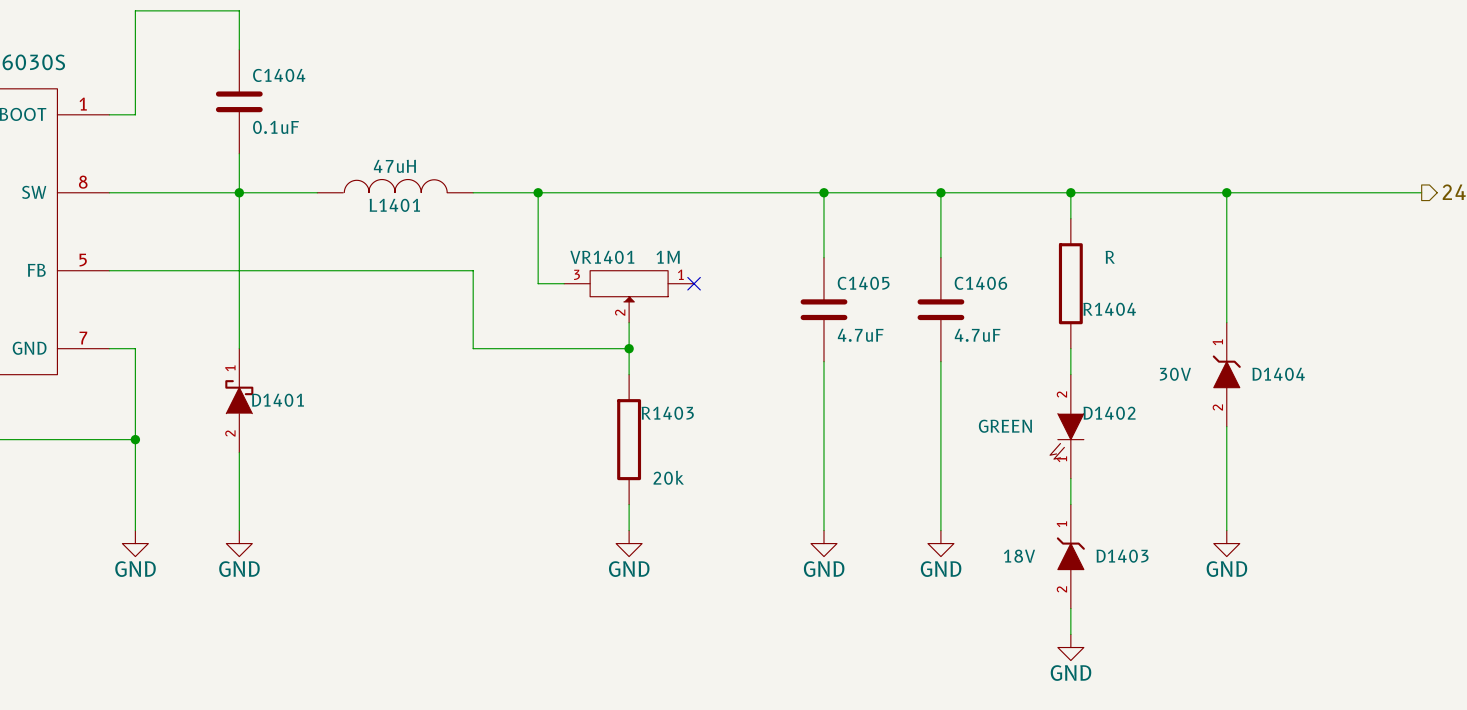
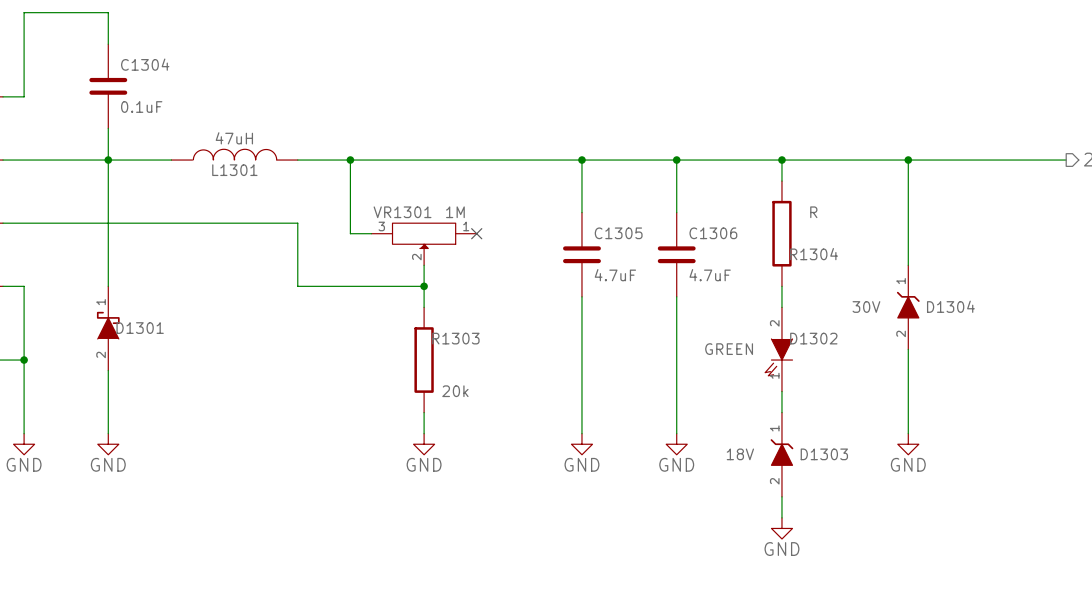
C1404 name: C1404 (279, 75) -> C1304 (145, 64)
L1401 name: L1401 (394, 205) -> L1301 (234, 170)
VR1401 name: VR1401 (602, 257) -> VR1301 (402, 212)
C1405 name: C1405 (863, 283) -> C1305 (618, 233)
C1406 name: C1406 (980, 283) -> C1306 (713, 233)
R1404 name: R1404 (1109, 309) -> R1304 (814, 254)
D1404 name: D1404 (1278, 374) -> D1304 (950, 306)
D1401 name: D1401 (277, 400) -> D1301 (140, 328)
R1403 name: R1403 (667, 413) -> R1303 (455, 338)
D1402 name: D1402 (1109, 413) -> D1302 (813, 338)
D1403 name: D1403 (1122, 556) -> D1303 (824, 454)

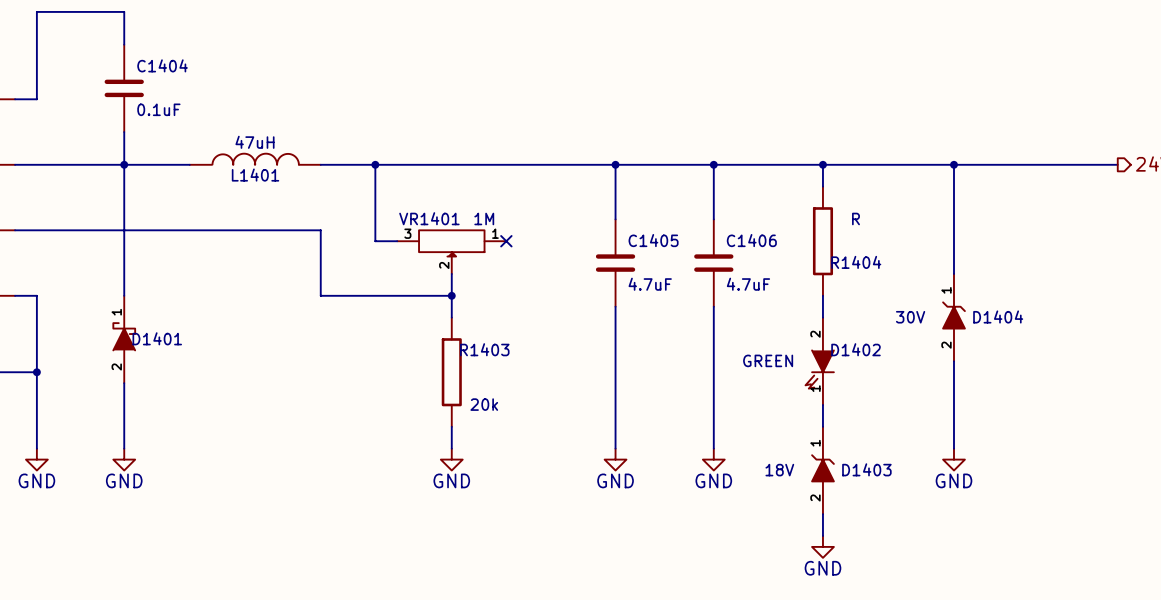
C1304 name: C1304 (145, 64) -> C1404 (162, 65)
L1301 name: L1301 (234, 170) -> L1401 (255, 175)
VR1301 name: VR1301 (402, 212) -> VR1401 (429, 218)
C1305 name: C1305 (618, 233) -> C1405 (653, 240)
C1306 name: C1306 (713, 233) -> C1406 (751, 240)
R1304 name: R1304 (814, 254) -> R1404 (856, 262)
D1304 name: D1304 (950, 306) -> D1404 (998, 316)
D1301 name: D1301 (140, 328) -> D1401 (157, 338)
R1303 name: R1303 (455, 338) -> R1403 (484, 349)
D1302 name: D1302 (813, 338) -> D1402 (855, 349)
D1303 name: D1303 (824, 454) -> D1403 (866, 469)

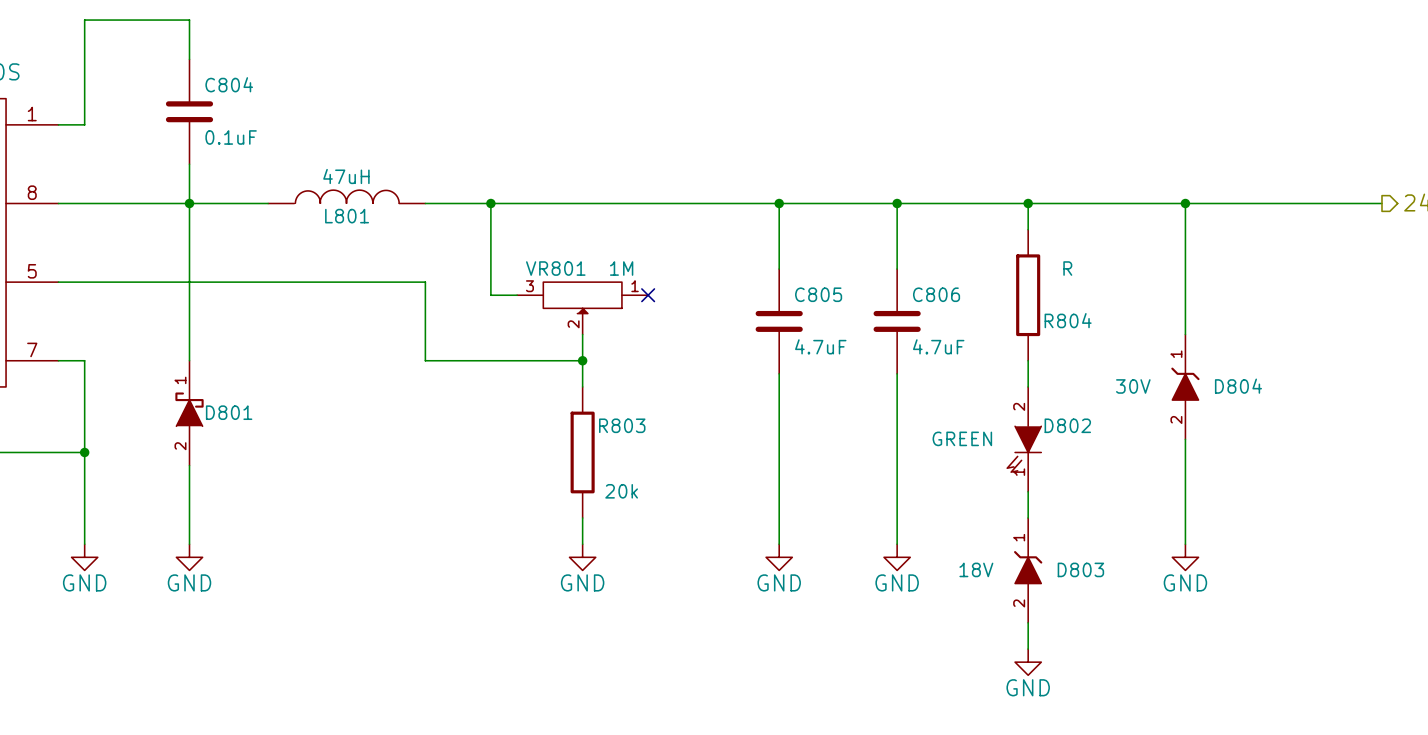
C1404 name: C1404 (162, 65) -> C804 (229, 84)
L1401 name: L1401 (255, 175) -> L801 (347, 216)
VR1401 name: VR1401 (429, 218) -> VR801 (555, 268)
C1405 name: C1405 (653, 240) -> C805 (818, 294)
C1406 name: C1406 (751, 240) -> C806 (936, 294)
R1404 name: R1404 (856, 262) -> R804 (1068, 320)
D1404 name: D1404 (998, 316) -> D804 (1238, 386)
D1401 name: D1401 (157, 338) -> D801 (229, 412)
R1403 name: R1403 (484, 349) -> R803 (622, 425)
D1402 name: D1402 (855, 349) -> D802 (1067, 425)
D1403 name: D1403 (866, 469) -> D803 (1080, 569)

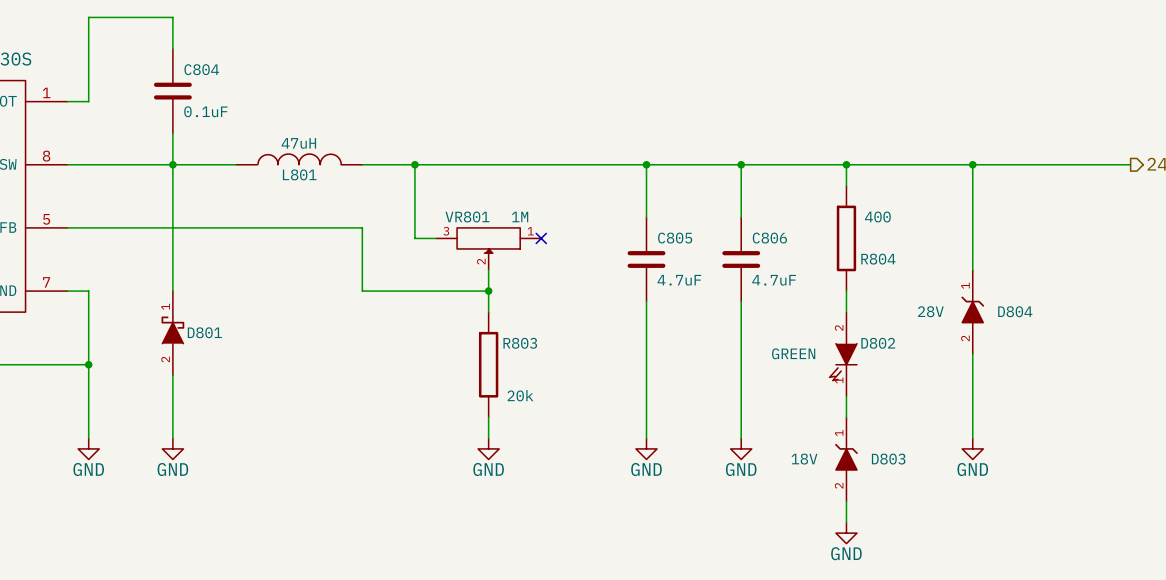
R804 value: R (1067, 268) -> 400 (877, 217)
D804 value: 30V (1133, 386) -> 28V (930, 311)

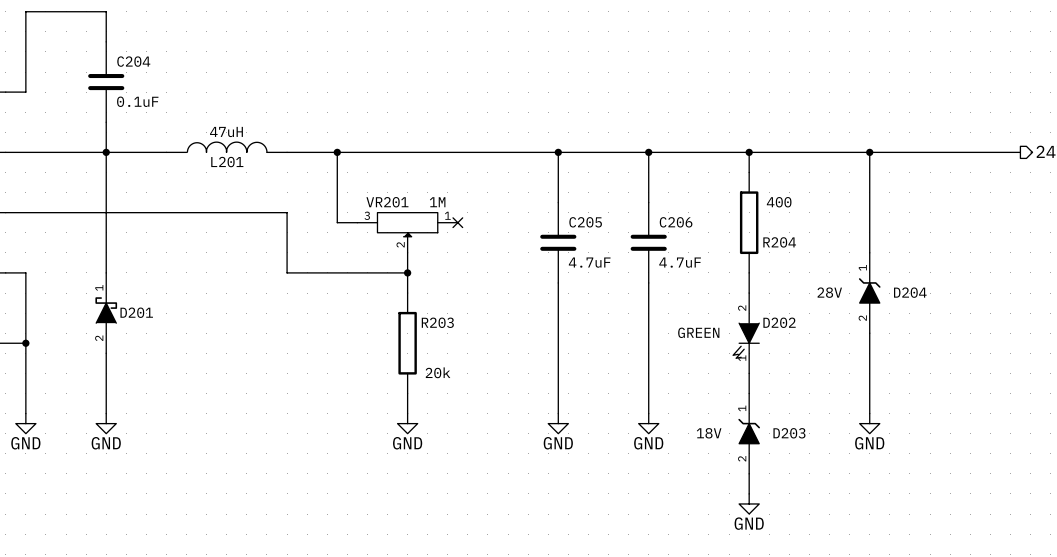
C804 name: C804 (201, 69) -> C204 (133, 61)
L801 name: L801 (299, 174) -> L201 (227, 162)
VR801 name: VR801 (467, 217) -> VR201 (387, 202)
C805 name: C805 (675, 238) -> C205 (585, 222)
C806 name: C806 (769, 238) -> C206 (676, 222)
R804 name: R804 (878, 259) -> R204 (779, 242)
D804 name: D804 (1015, 311) -> D204 (910, 292)
D801 name: D801 (204, 332) -> D201 (136, 312)
R803 name: R803 (520, 343) -> R203 (437, 322)
D802 name: D802 (878, 343) -> D202 (779, 322)
D803 name: D803 (888, 459) -> D203 (789, 433)

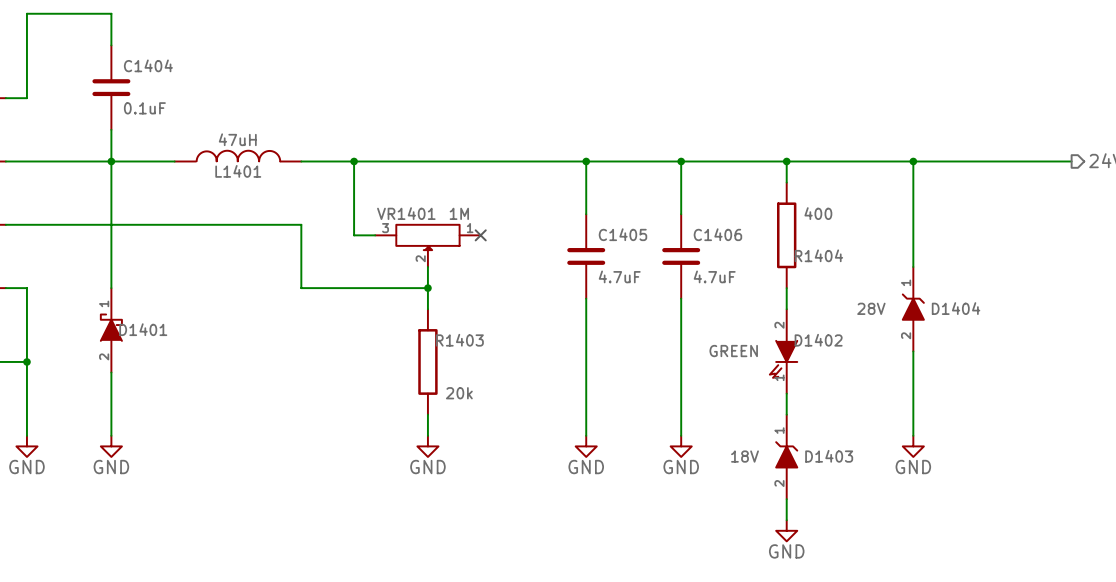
C204 name: C204 (133, 61) -> C1404 (148, 65)
L201 name: L201 (227, 162) -> L1401 (238, 171)
VR201 name: VR201 (387, 202) -> VR1401 (406, 213)
C205 name: C205 (585, 222) -> C1405 (622, 234)
C206 name: C206 (676, 222) -> C1406 (717, 234)
R204 name: R204 (779, 242) -> R1404 (818, 255)
D204 name: D204 (910, 292) -> D1404 (956, 308)
D201 name: D201 (136, 312) -> D1401 (143, 329)
R203 name: R203 (437, 322) -> R1403 (459, 340)
D202 name: D202 (779, 322) -> D1402 (818, 340)
D203 name: D203 (789, 433) -> D1403 (829, 456)

